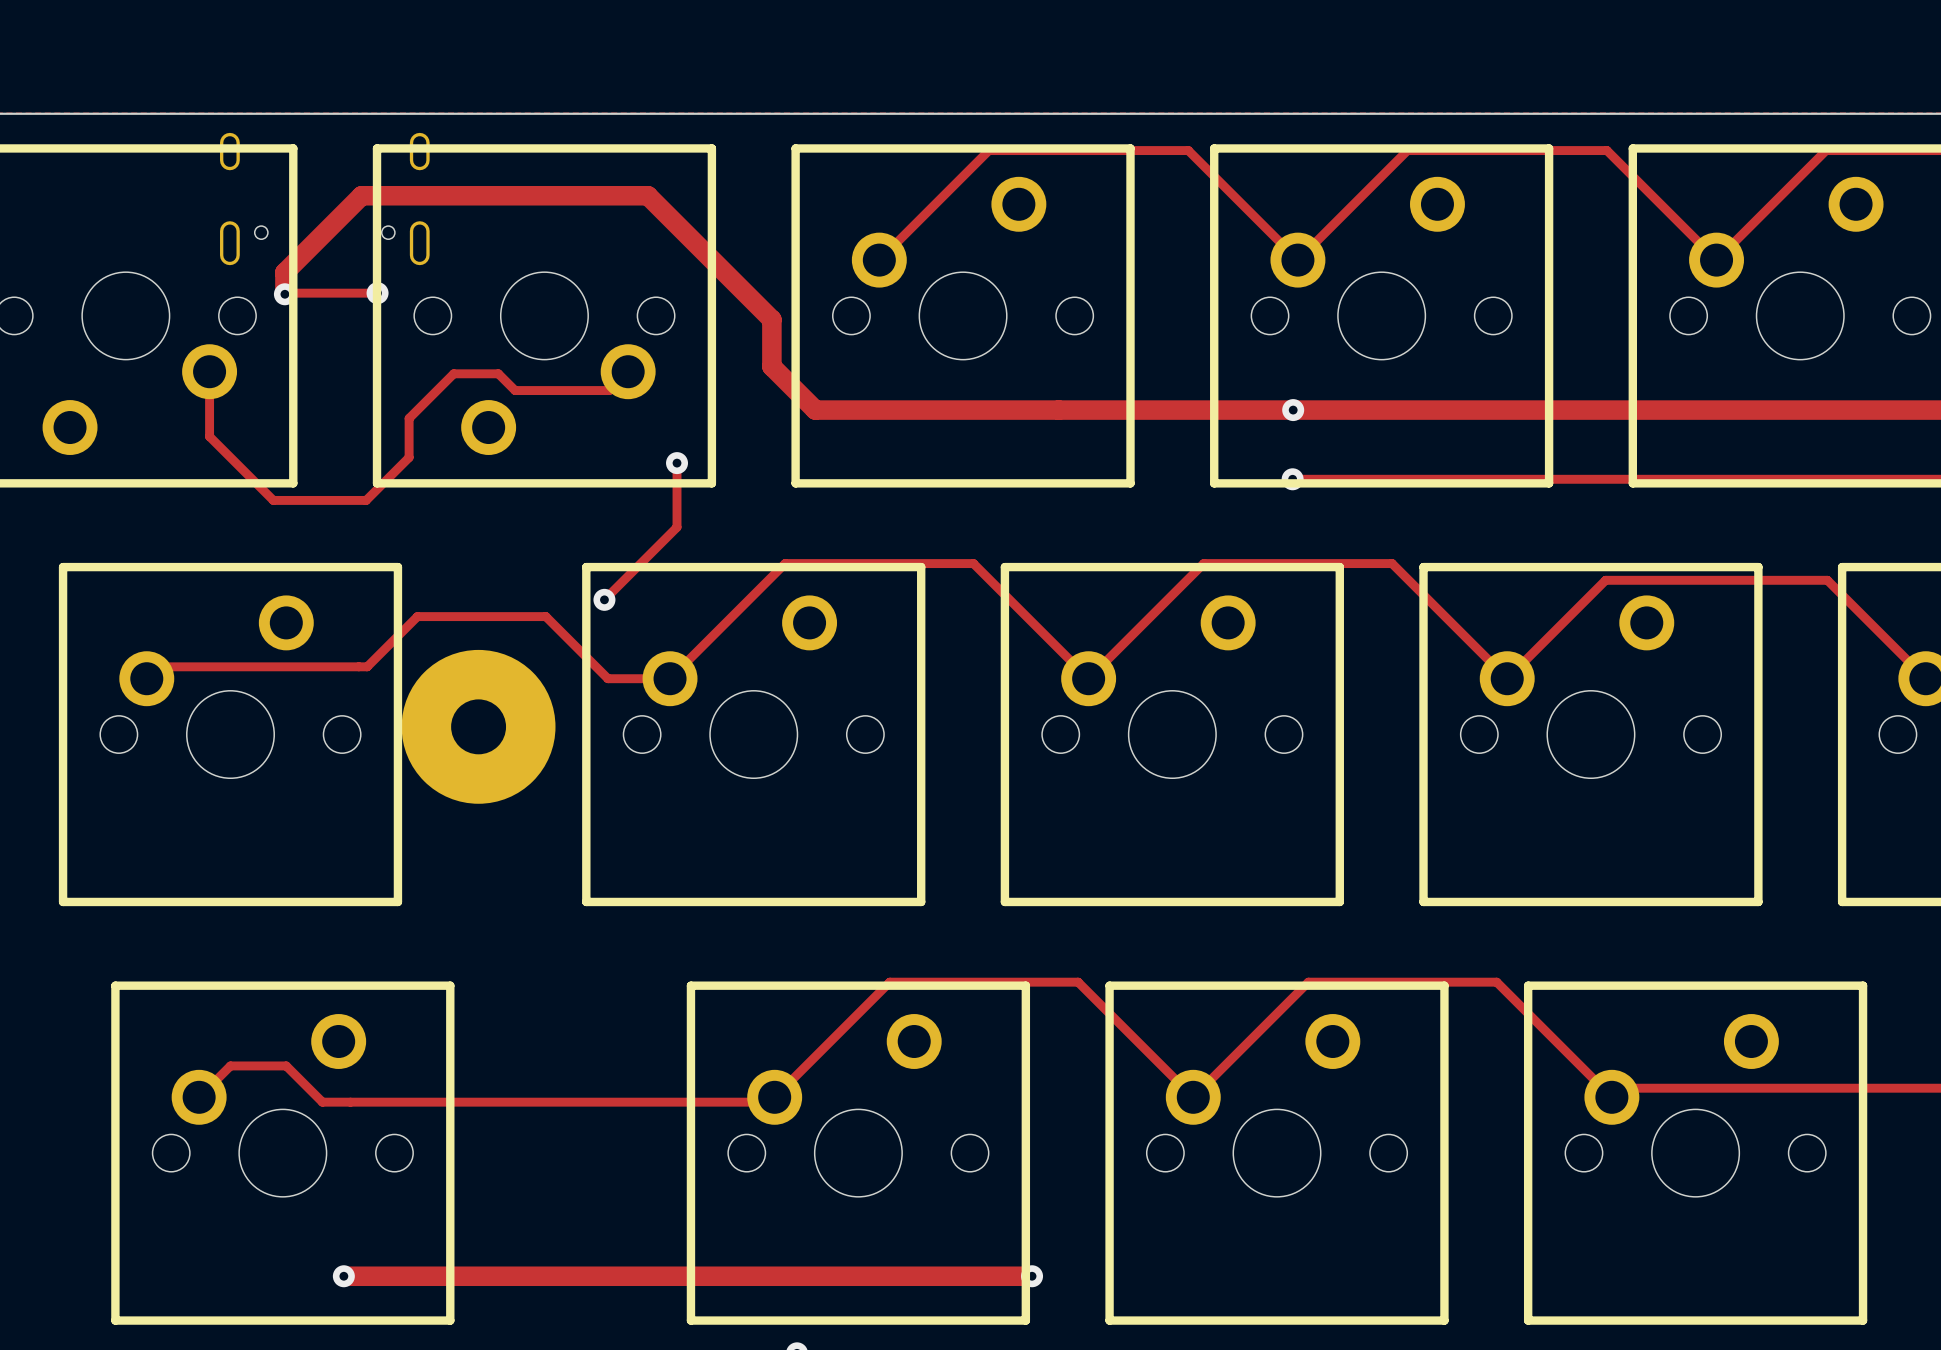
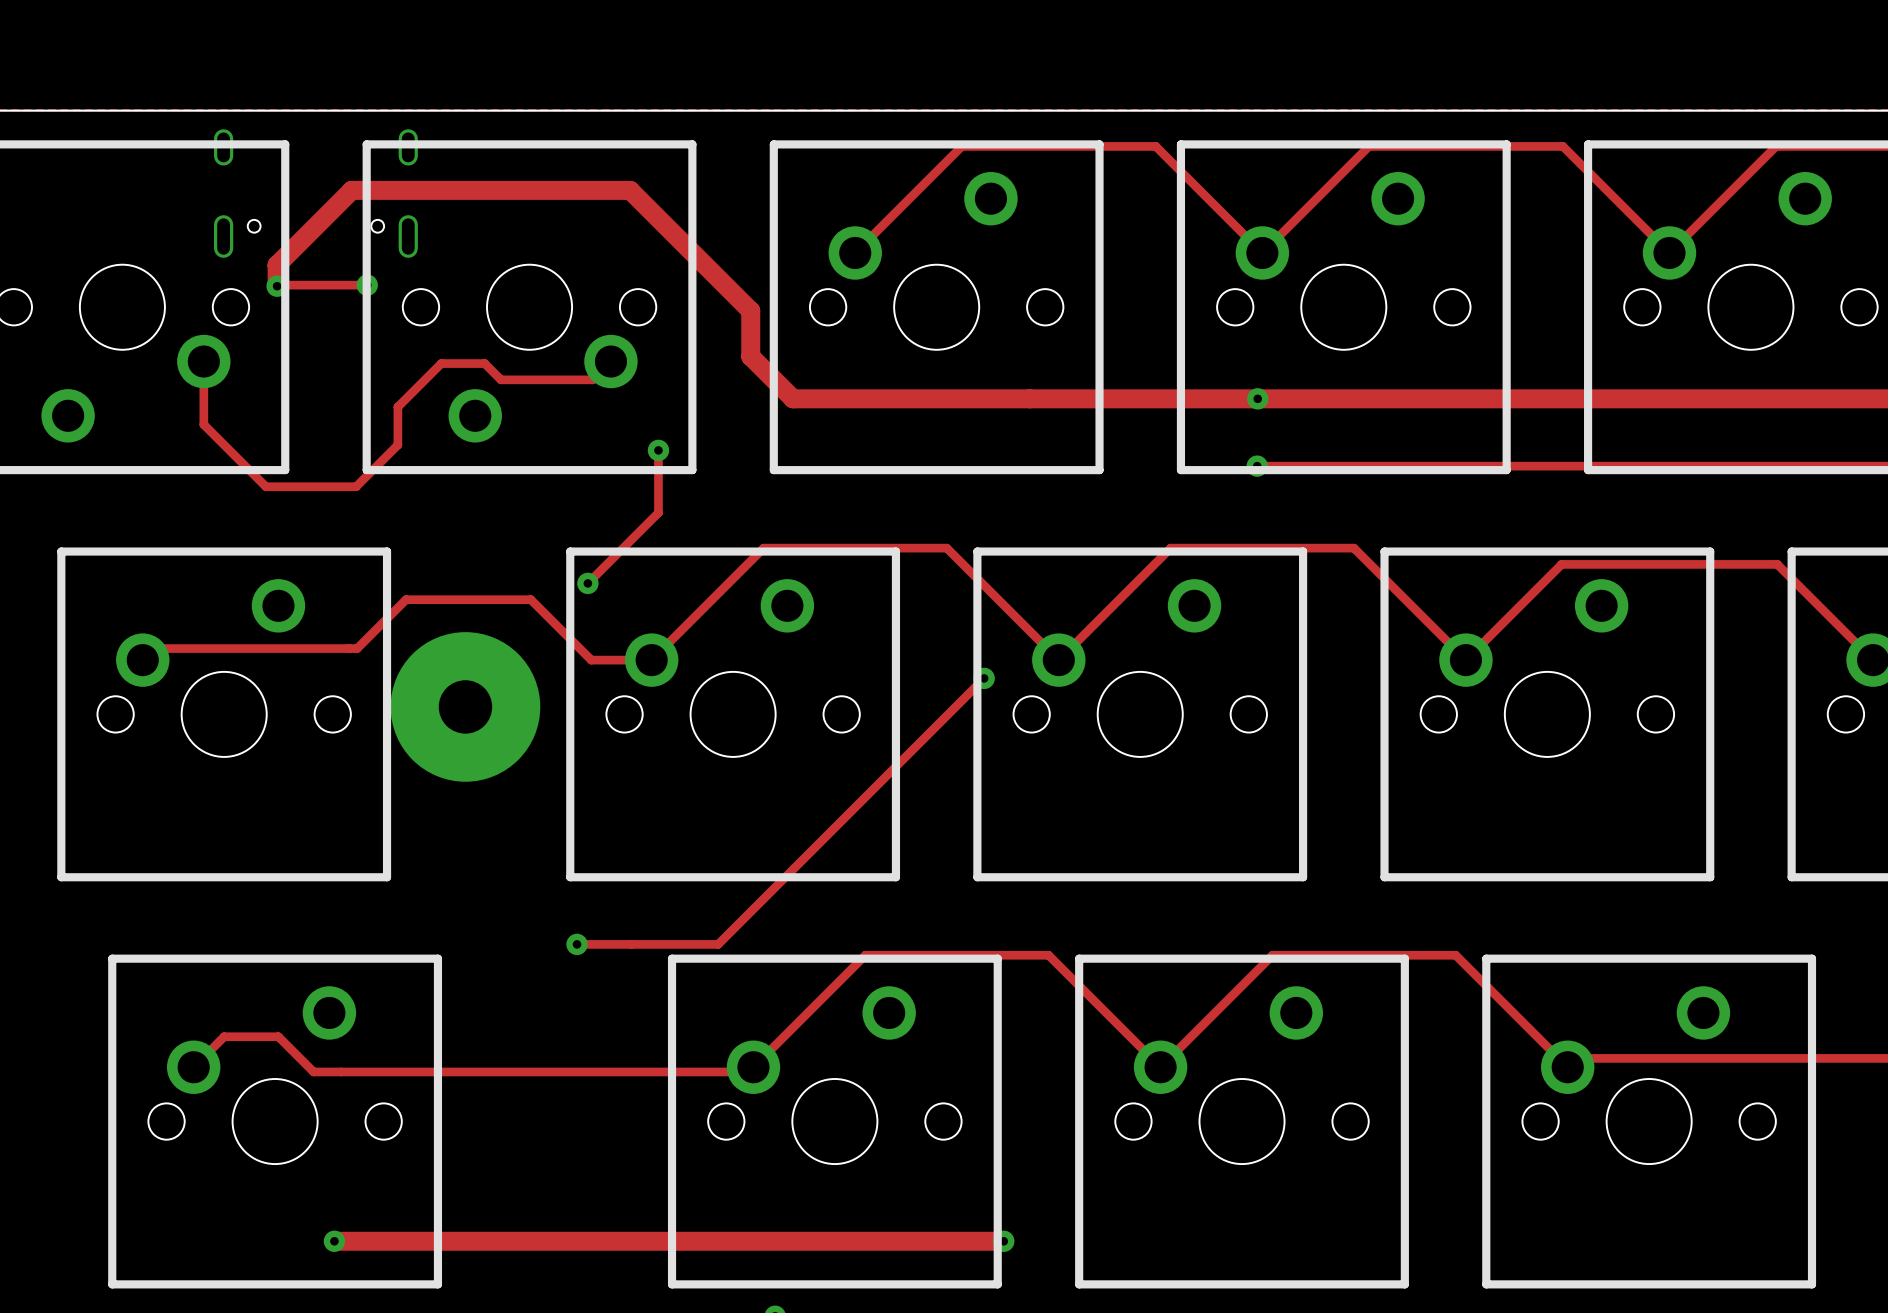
track: none -> (984, 678) (718, 944) (577, 944)
via: none -> (984, 678)
via: none -> (577, 944)

